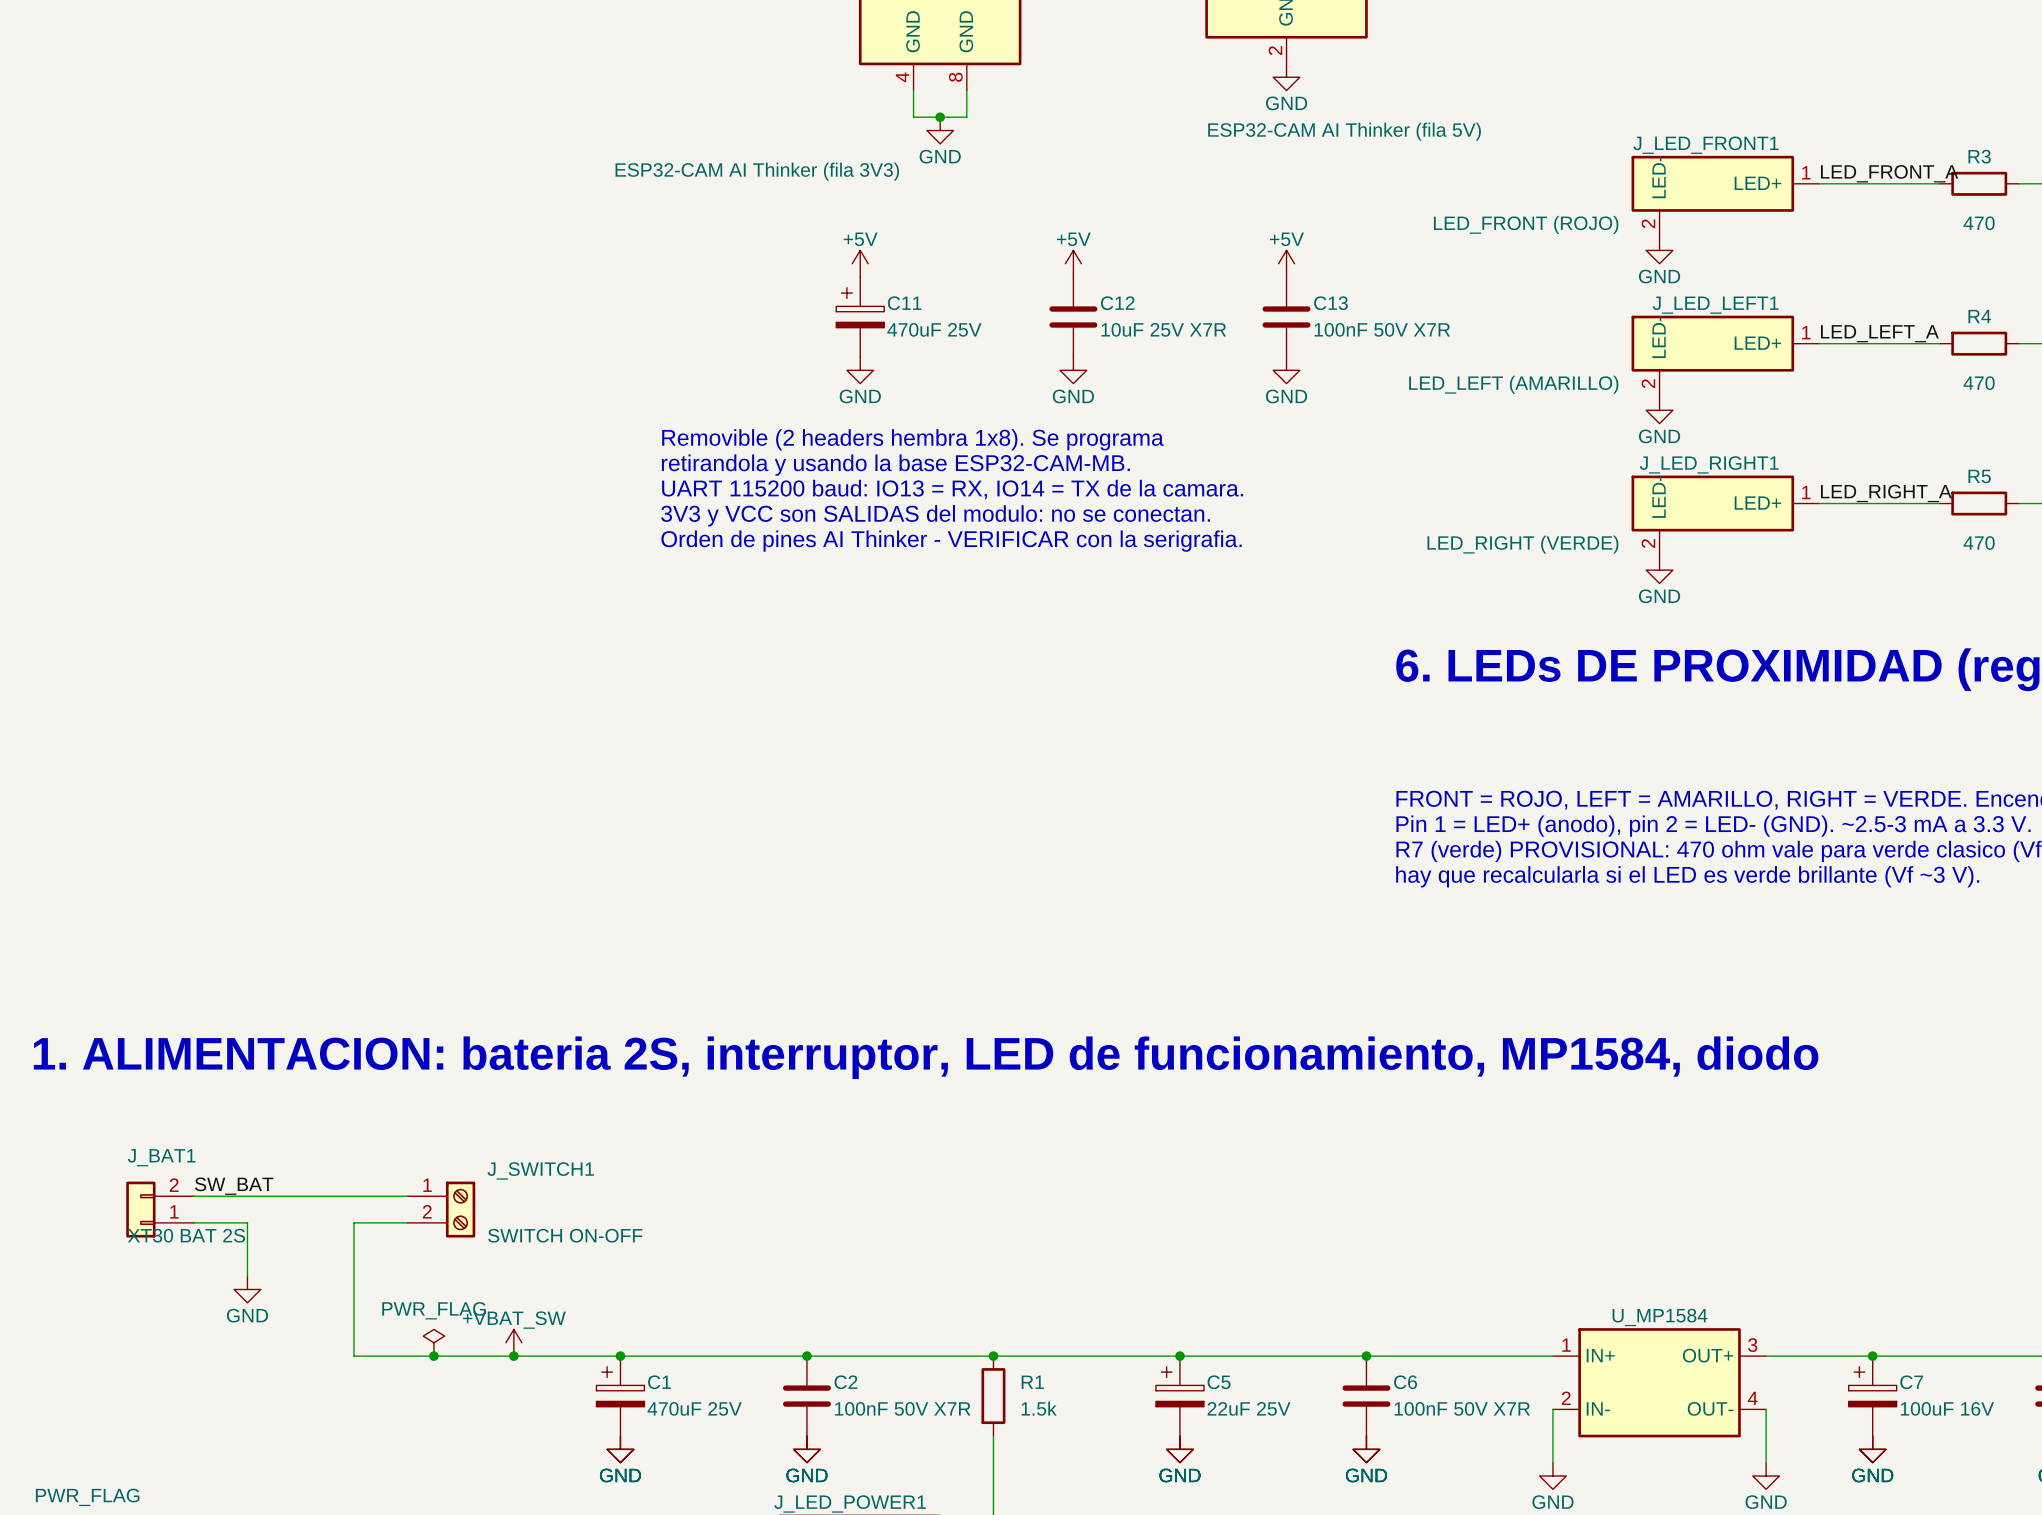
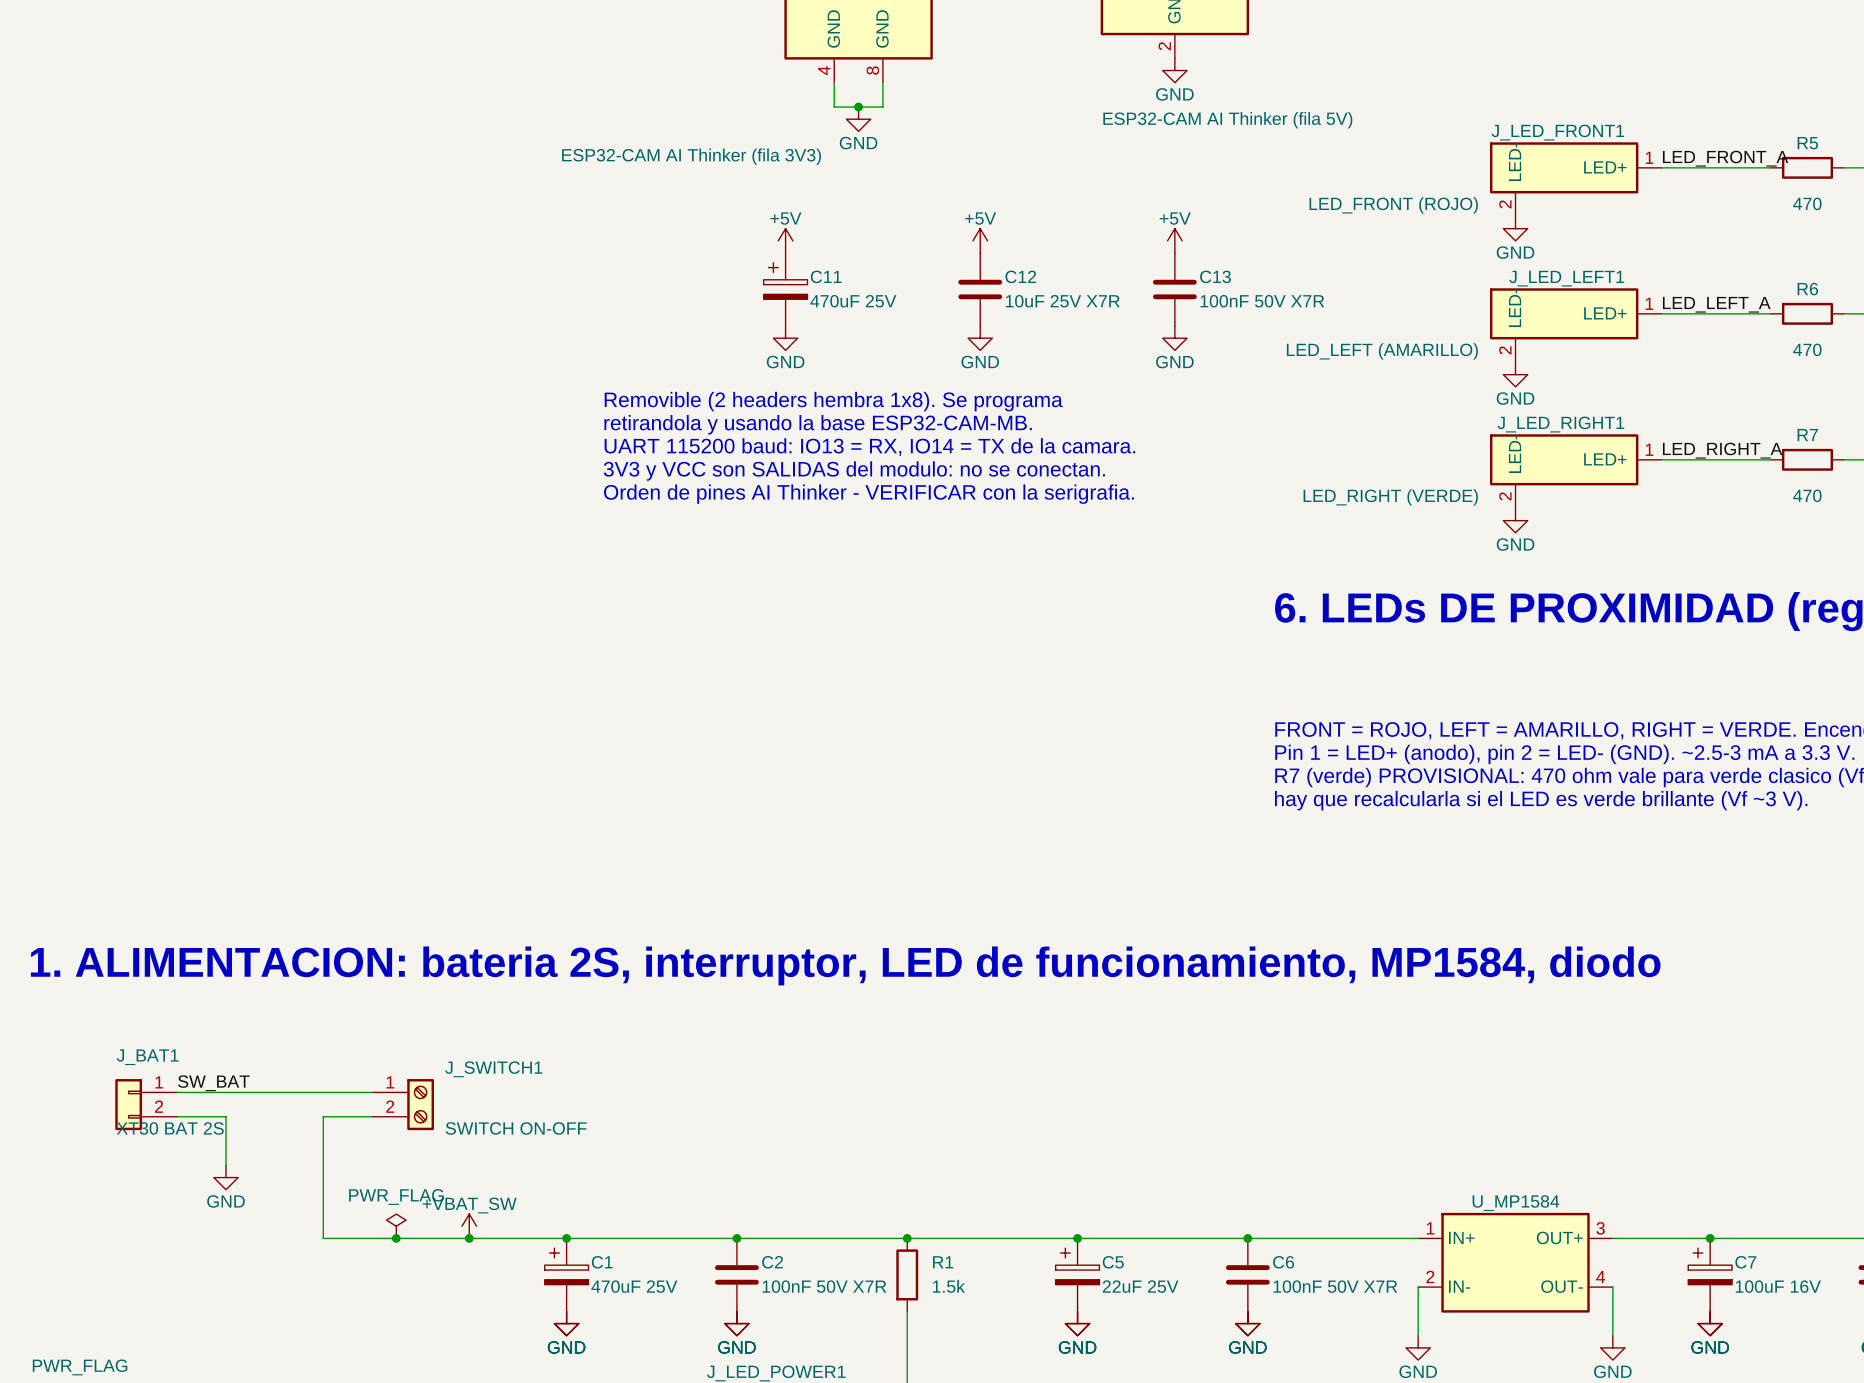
R3 name: R3 (1979, 156) -> R5 (1807, 143)
R4 name: R4 (1979, 316) -> R6 (1807, 289)
R5 name: R5 (1979, 476) -> R7 (1807, 435)
J_BAT1 flip: as is (140, 1209) -> up-down (128, 1104)

